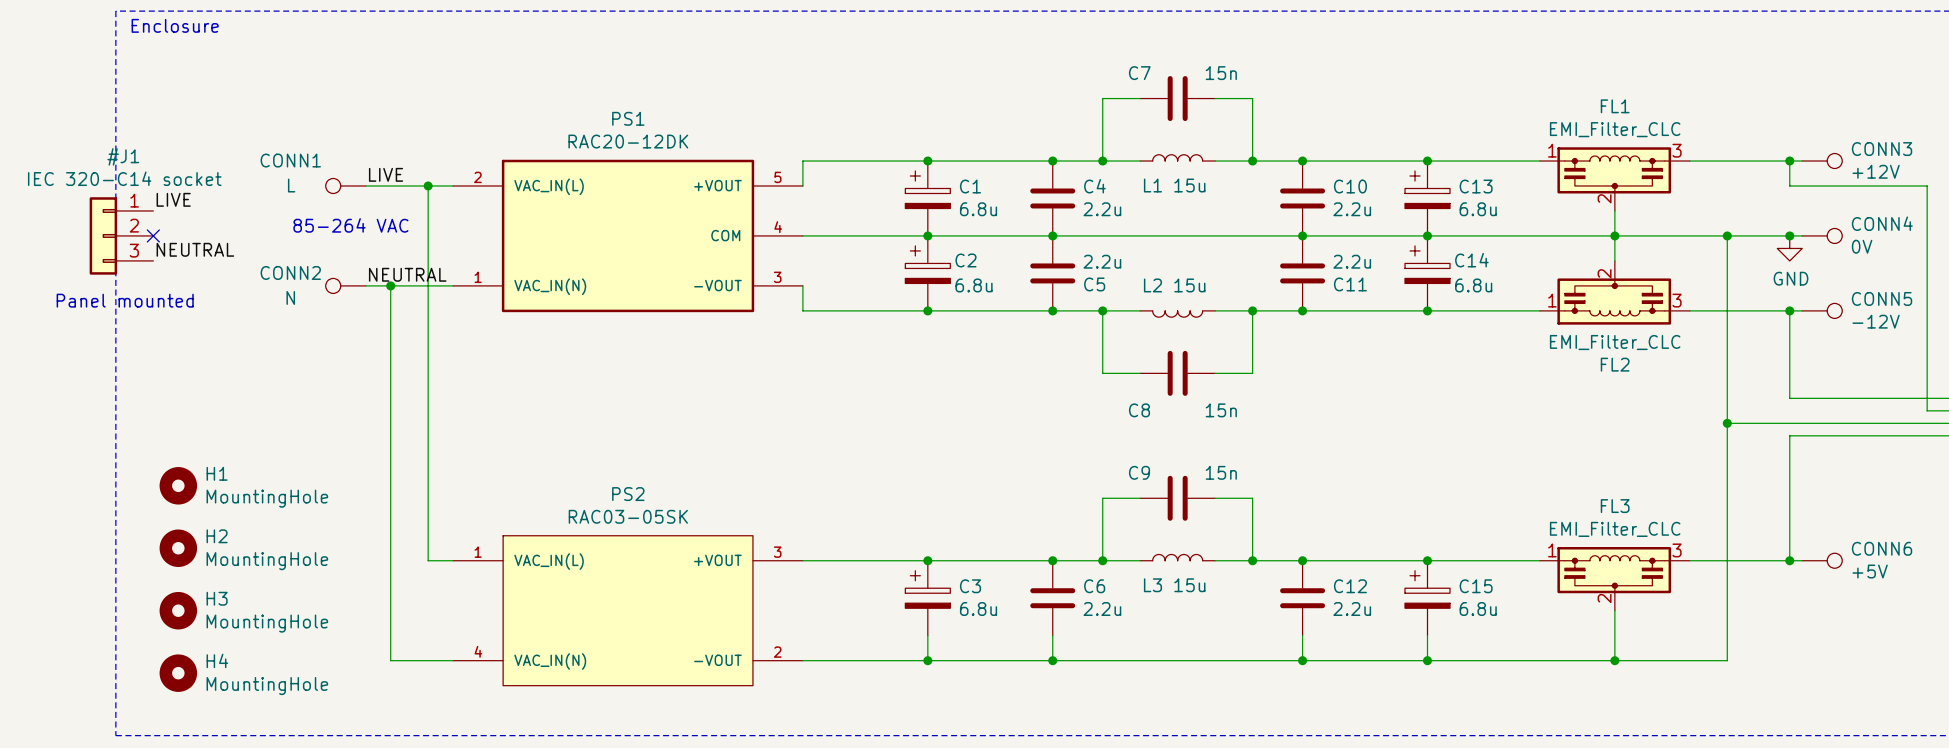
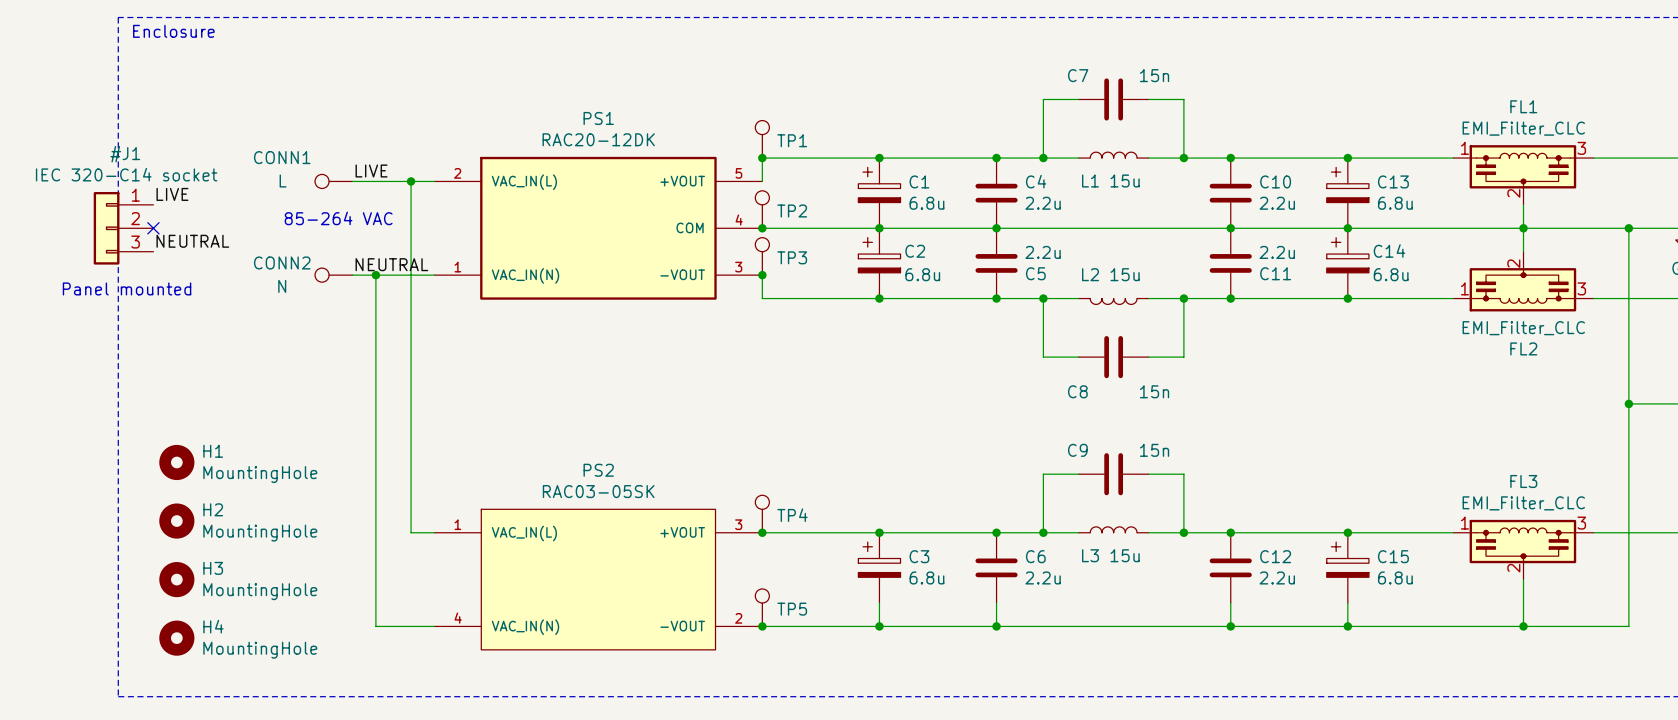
TP1: none -> (762, 139)
junction: none -> (762, 158)
TP2: none -> (762, 209)
junction: none -> (762, 228)
TP3: none -> (762, 256)
junction: none -> (762, 275)
TP4: none -> (762, 514)
junction: none -> (762, 532)
TP5: none -> (762, 607)
junction: none -> (762, 626)

